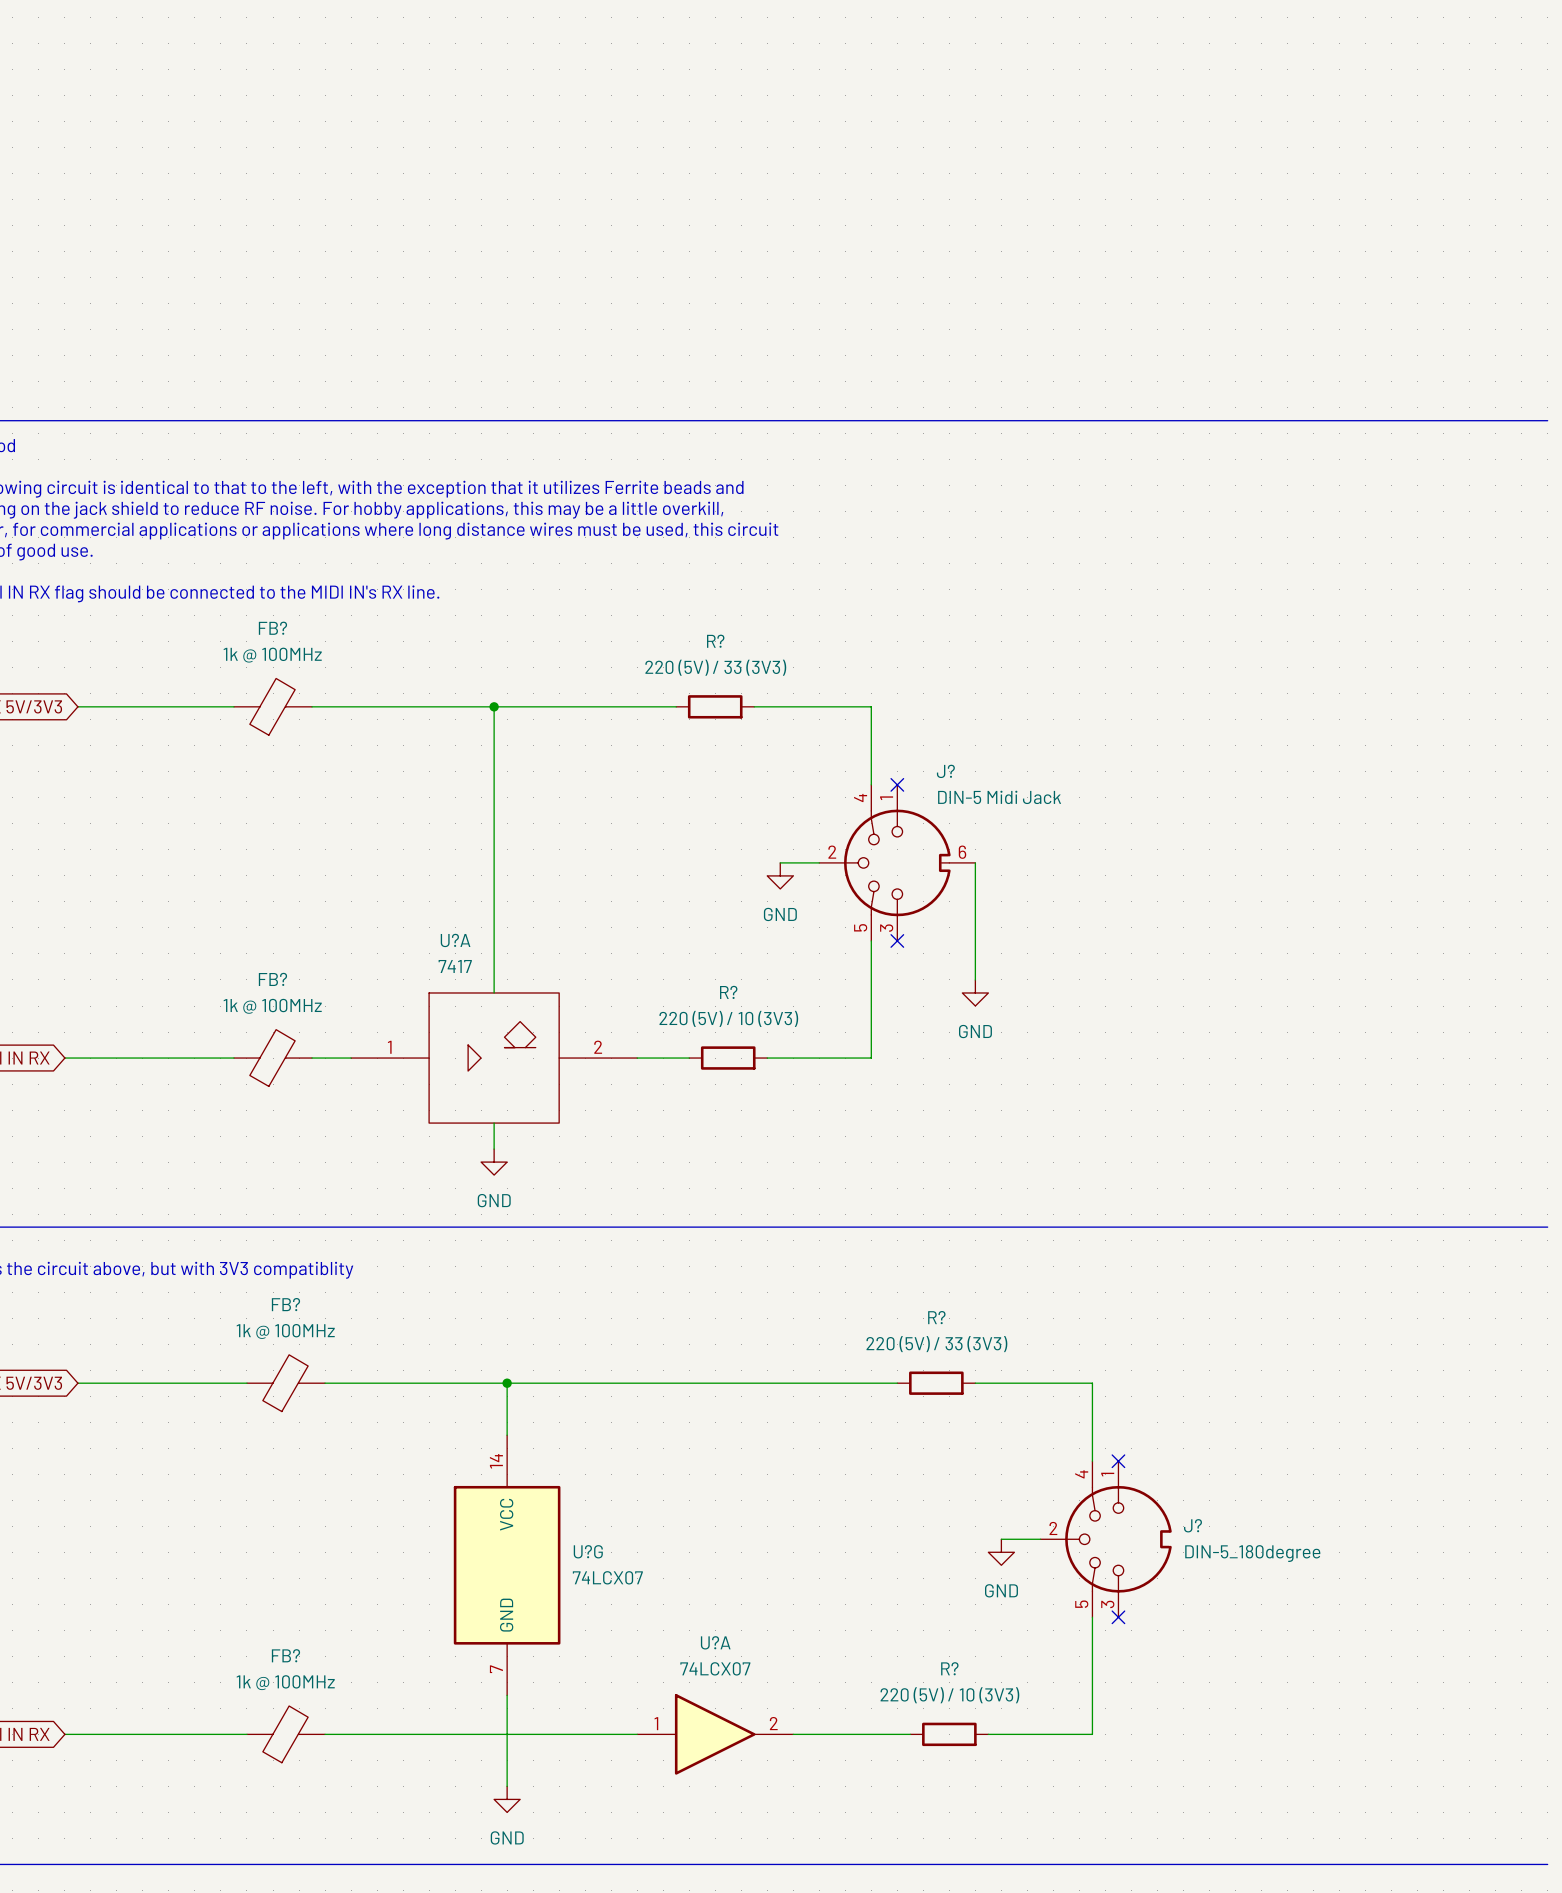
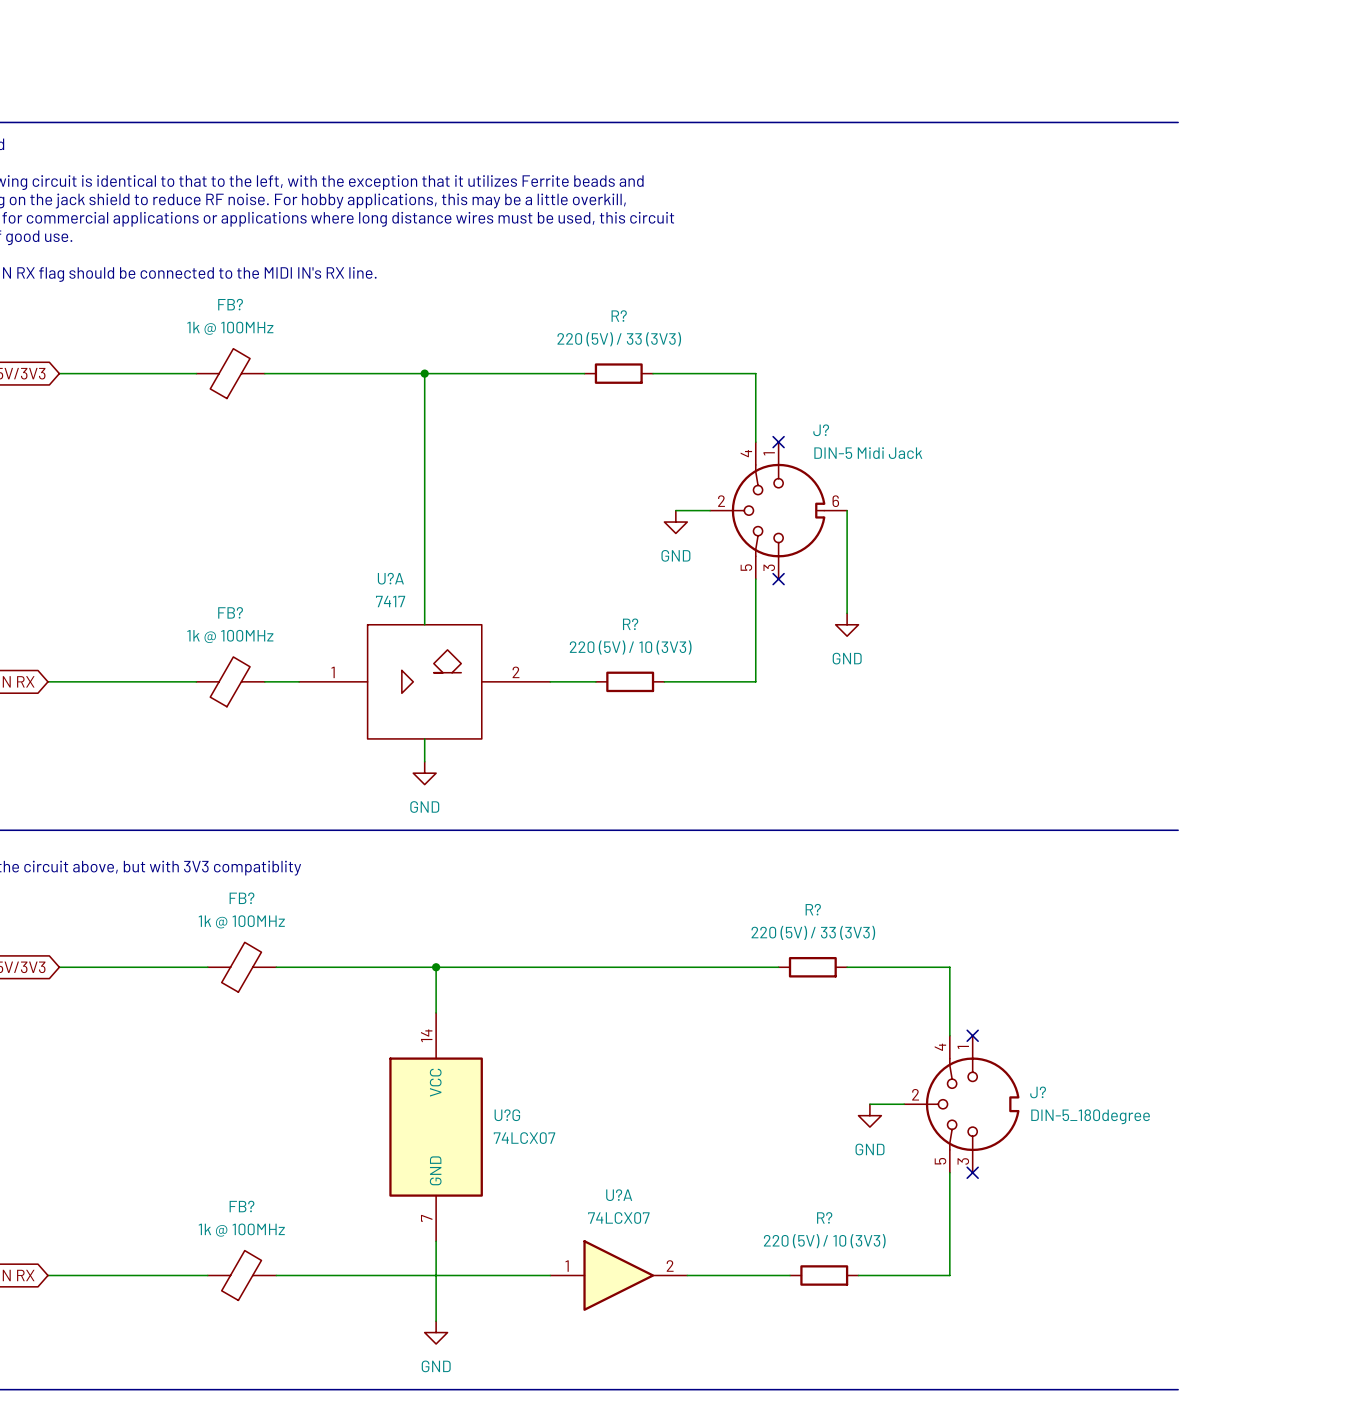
line: (1352, 420) (1547, 420) -> none
line: (1352, 1227) (1547, 1227) -> none
line: (1352, 1864) (1547, 1864) -> none

